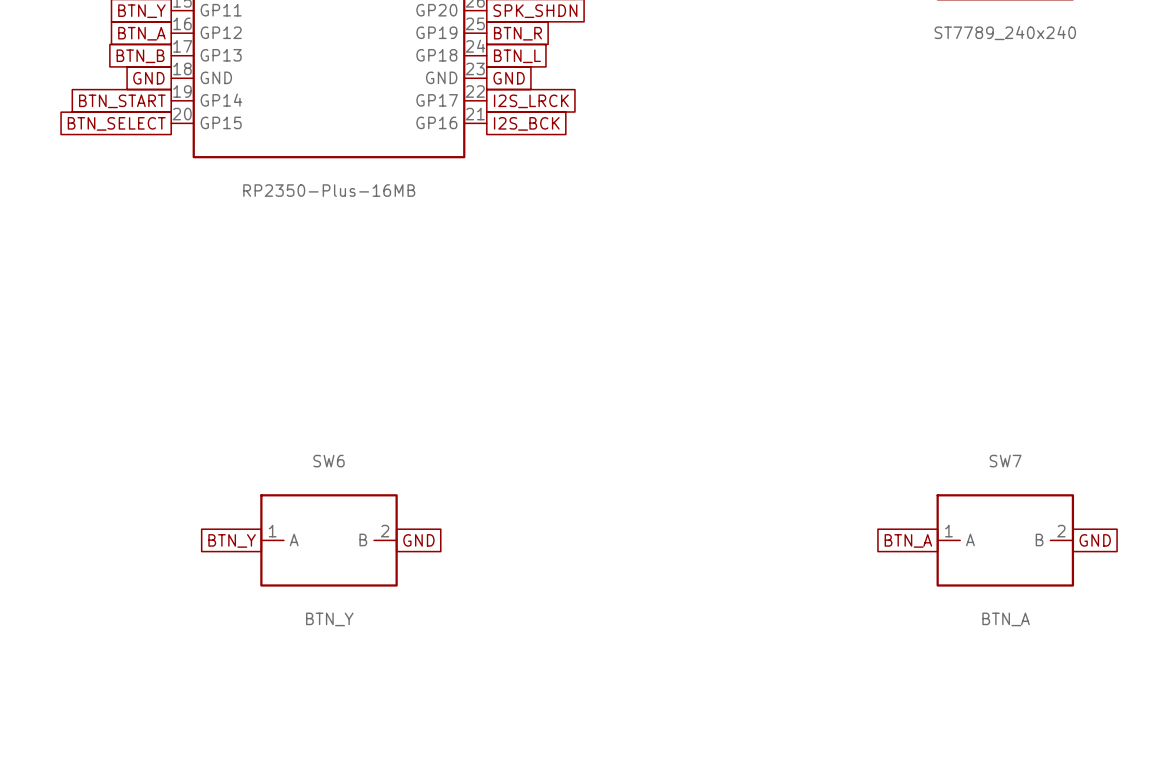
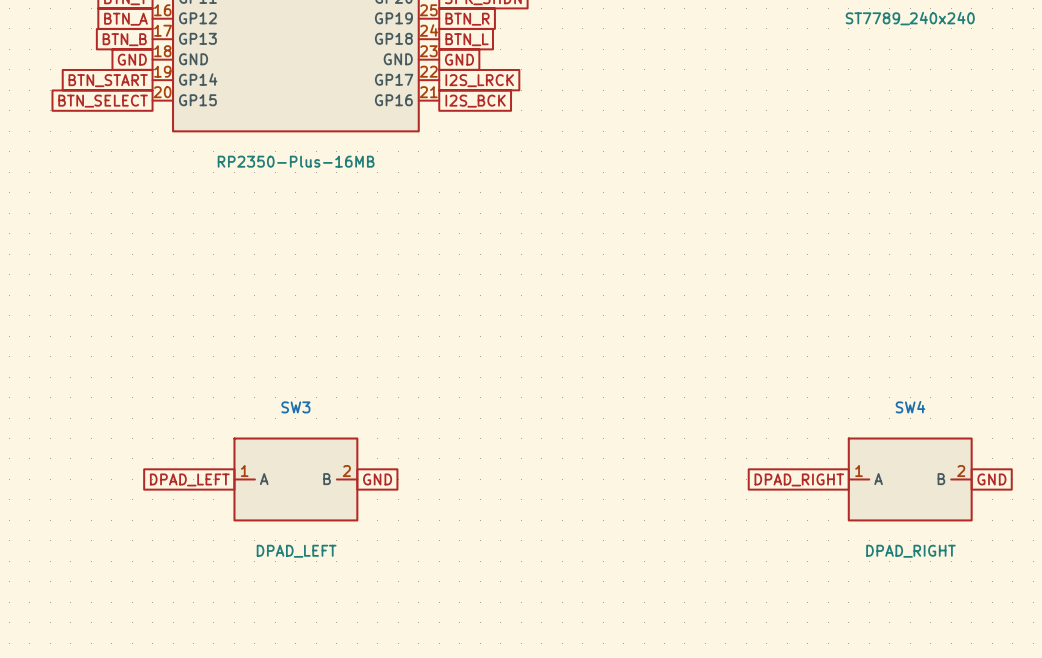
SW6 name: SW6 (329, 461) -> SW3 (295, 407)
SW7 name: SW7 (1005, 461) -> SW4 (910, 407)
global label: BTN_Y (232, 540) -> DPAD_LEFT (189, 479)
global label: BTN_A (908, 540) -> DPAD_RIGHT (799, 479)
SW6 value: BTN_Y (329, 619) -> DPAD_LEFT (296, 551)
SW7 value: BTN_A (1006, 619) -> DPAD_RIGHT (910, 551)

